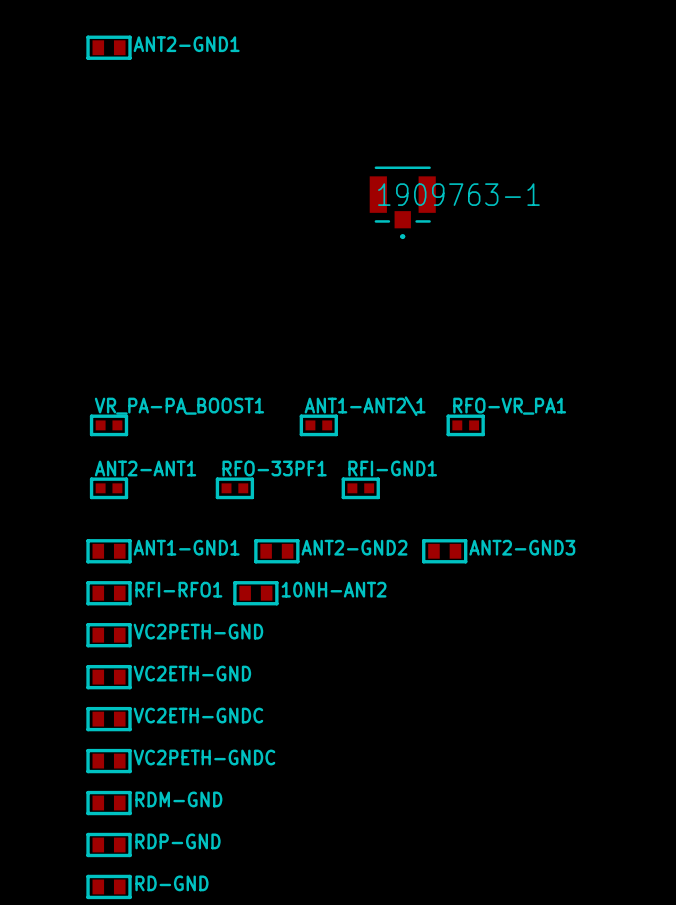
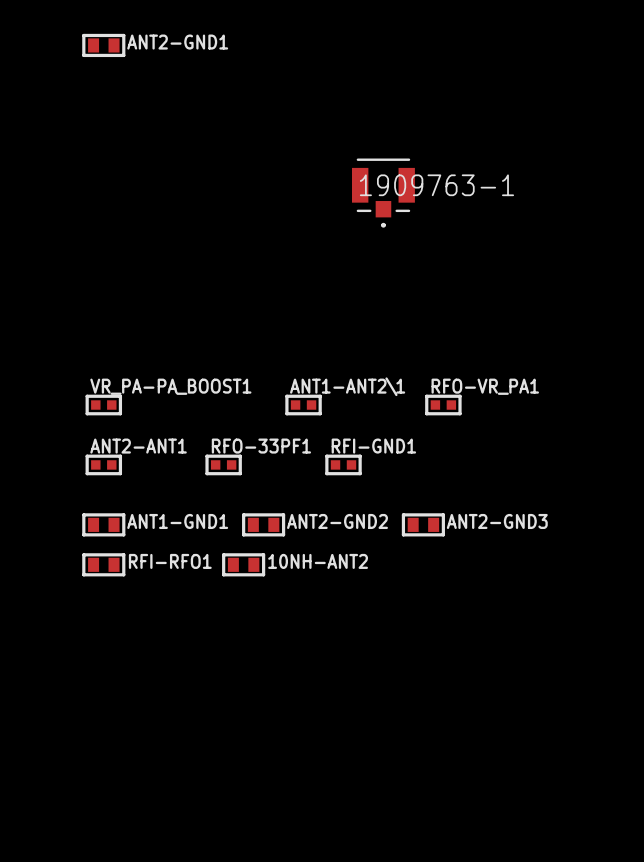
VC2PETH-GND: (109, 635) -> none
VC2ETH-GND: (109, 677) -> none
VC2ETH-GNDC: (109, 719) -> none
VC2PETH-GNDC: (109, 761) -> none
RDM-GND: (109, 803) -> none
RDP-GND: (109, 844) -> none
RD-GND: (109, 886) -> none

